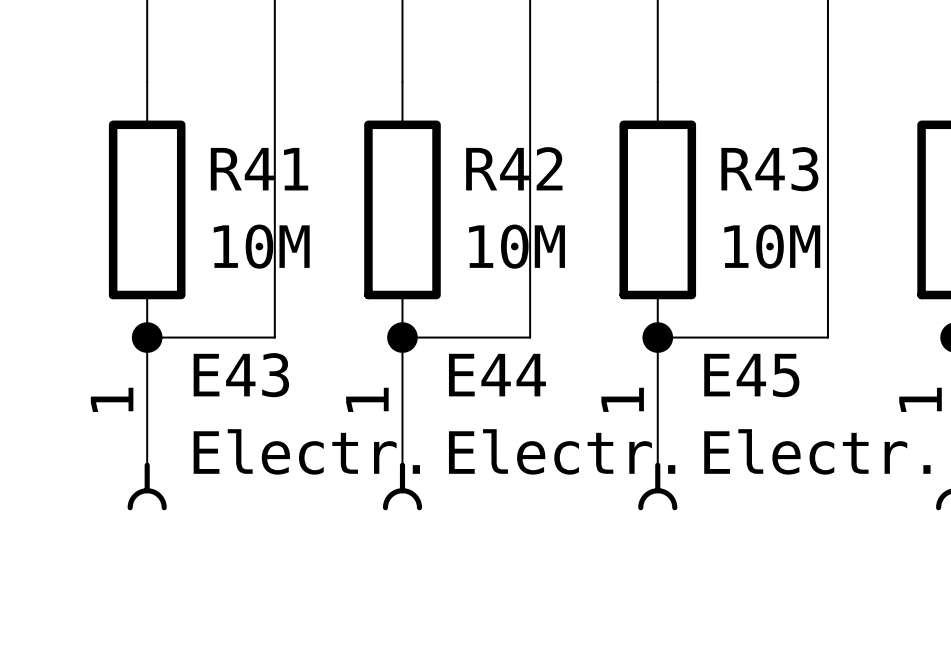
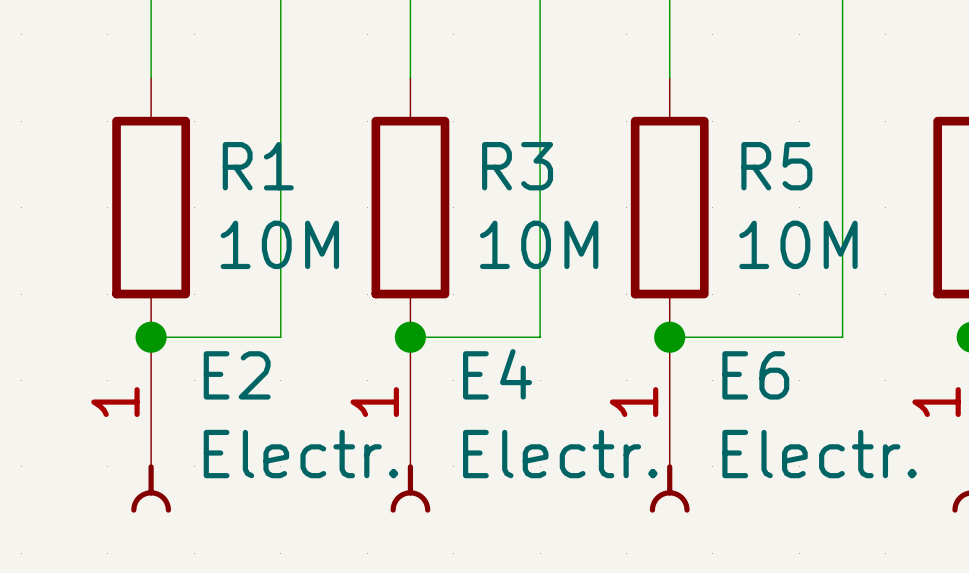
R42 name: R42 (514, 168) -> R3 (517, 166)
R41 name: R41 (259, 169) -> R1 (258, 166)
R43 name: R43 (769, 169) -> R5 (776, 166)
E43 name: E43 (241, 375) -> E2 (237, 375)
E44 name: E44 (497, 375) -> E4 (497, 374)
E45 name: E45 (751, 375) -> E6 (755, 375)

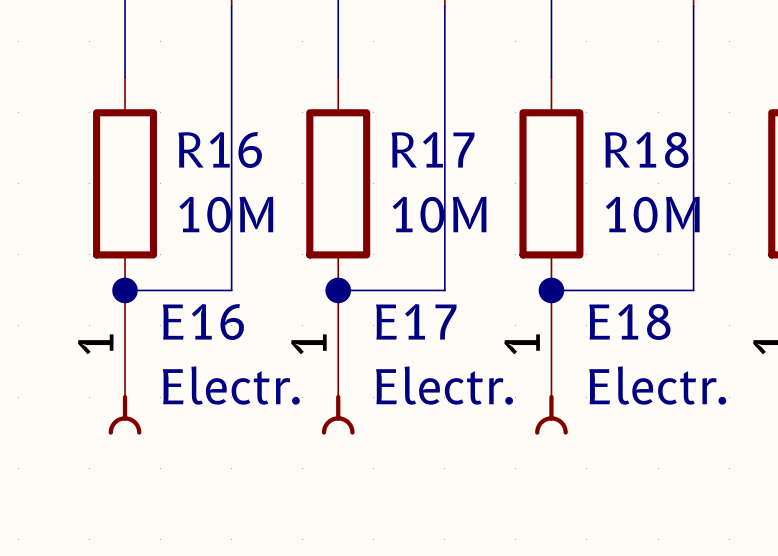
R1 name: R1 (258, 166) -> R16 (220, 150)
R3 name: R3 (517, 166) -> R17 (433, 149)
R5 name: R5 (776, 166) -> R18 (646, 150)
E4 name: E4 (497, 374) -> E17 (416, 321)
E2 name: E2 (237, 375) -> E16 (203, 322)
E6 name: E6 (755, 375) -> E18 (629, 322)

